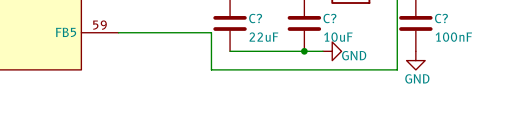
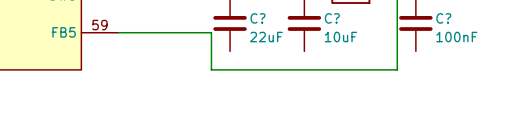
wire: (230, 51) (322, 51) -> none
junction: (304, 51) -> none
power symbol: GND (332, 51) -> none
power symbol: GND (415, 60) -> none

